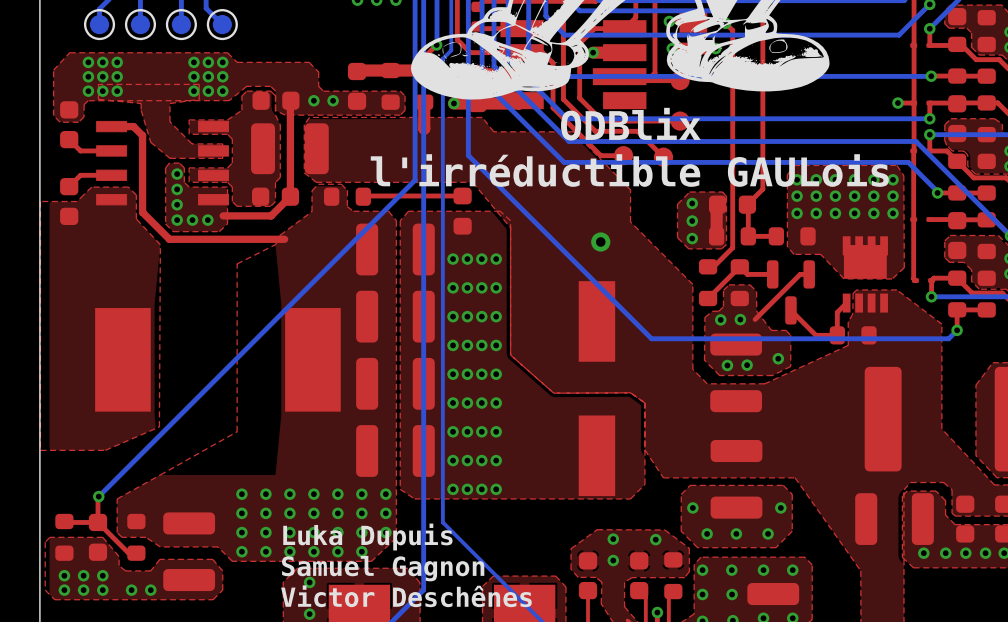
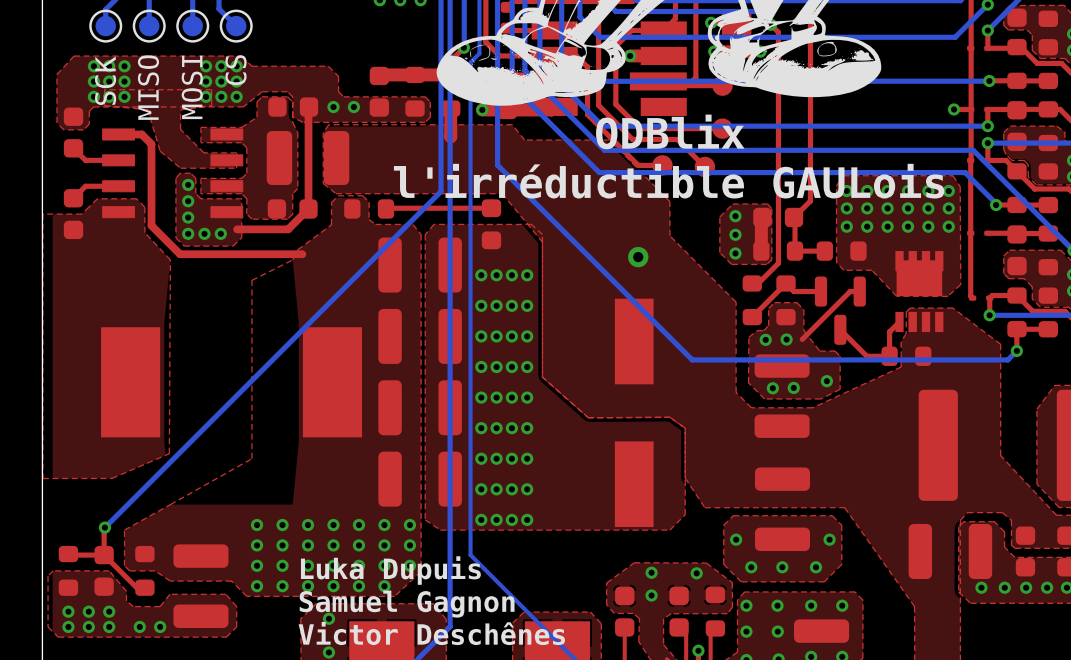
text: none -> CS (236, 70)
text: none -> SCK (105, 80)
text: none -> MISO (148, 87)
text: none -> MOSI (192, 87)

